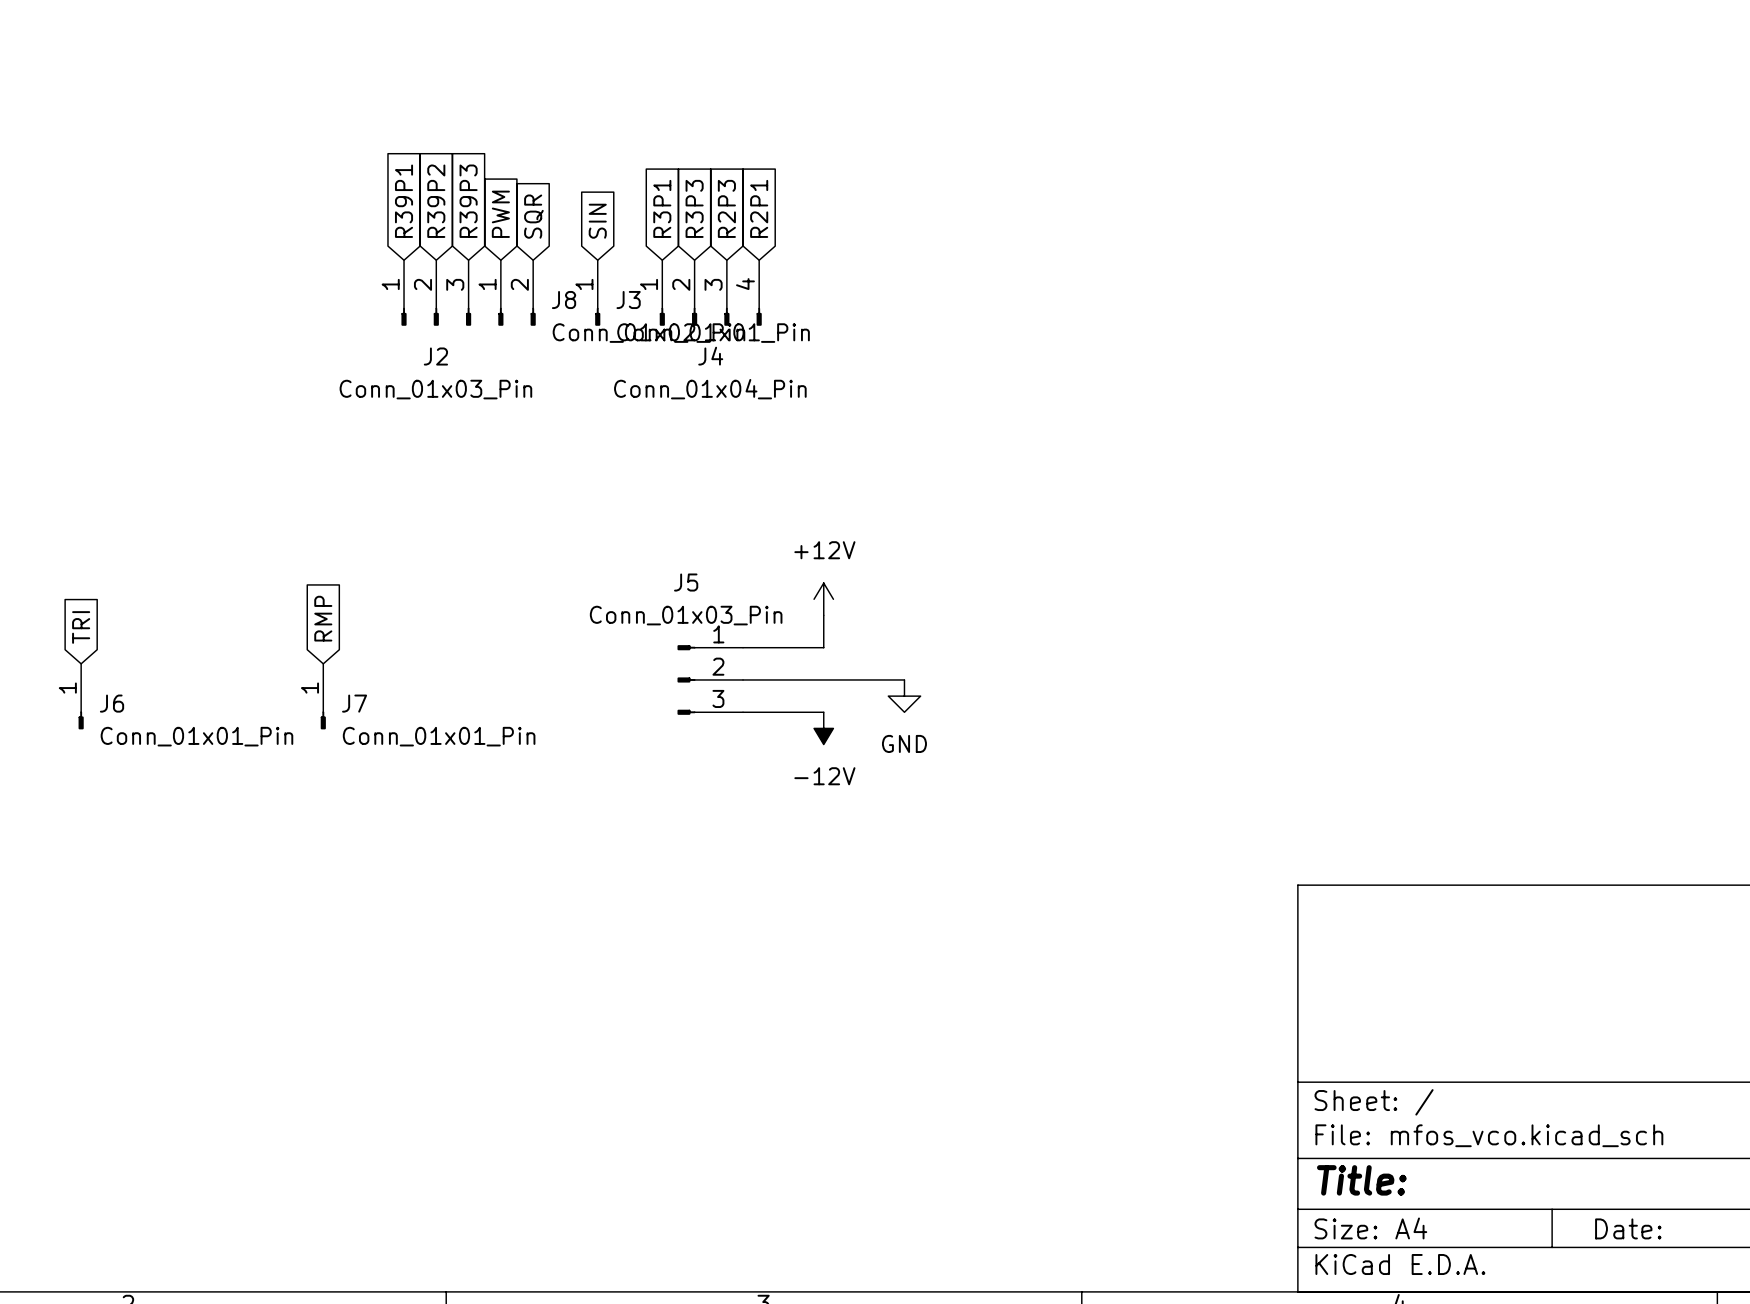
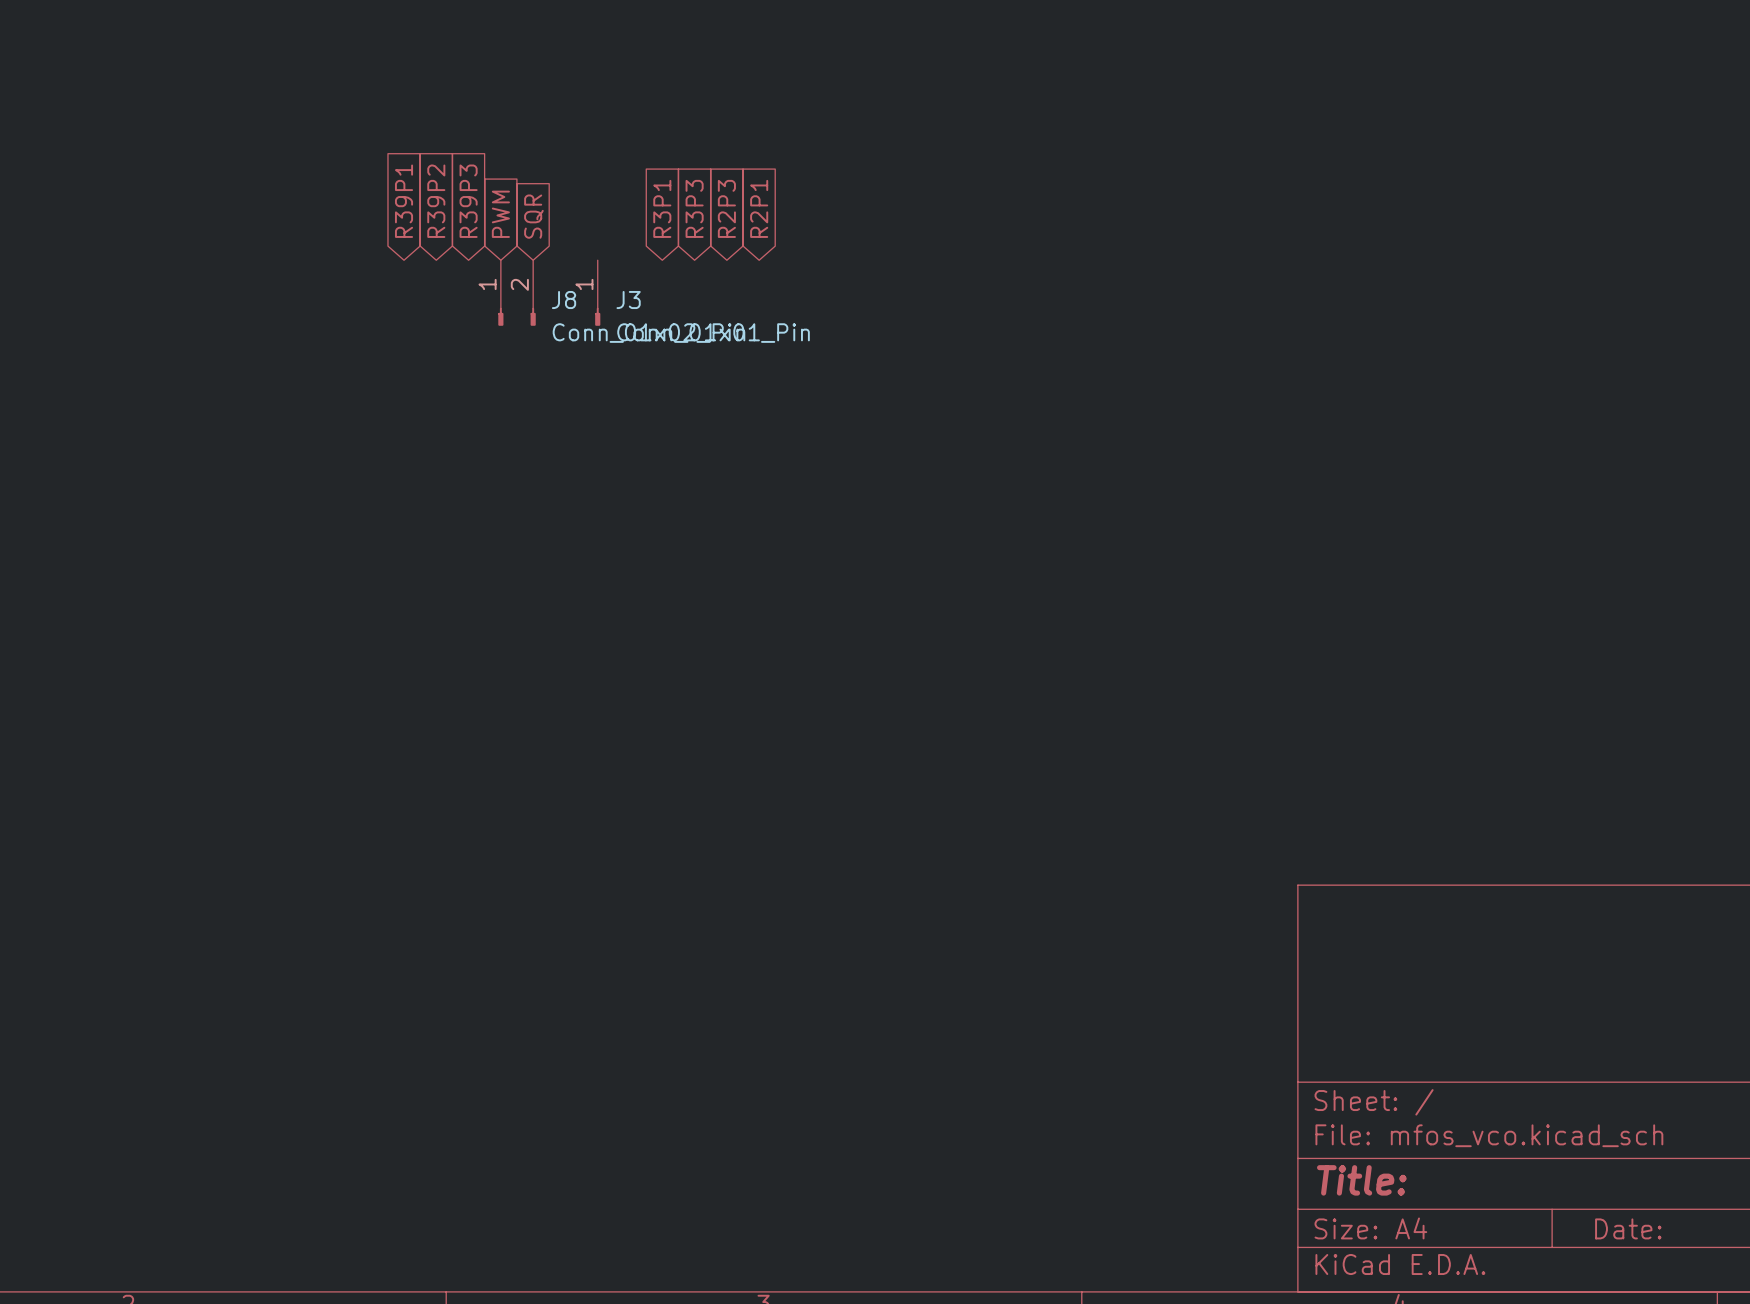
global label: SIN (597, 221) -> none
J2: Conn_01x03_Pin (436, 293) -> none
J4: Conn_01x04_Pin (710, 293) -> none
power symbol: +12V (823, 599) -> none
wire: (823, 615) (823, 647) (743, 647) -> none
global label: RMP (323, 618) -> none
global label: TRI (81, 627) -> none
J5: Conn_01x03_Pin (710, 679) -> none
wire: (743, 679) (904, 679) -> none
J6: Conn_01x01_Pin (81, 696) -> none
J7: Conn_01x01_Pin (323, 696) -> none
power symbol: GND (904, 696) -> none
wire: (743, 712) (823, 712) -> none
power symbol: -12V (823, 728) -> none

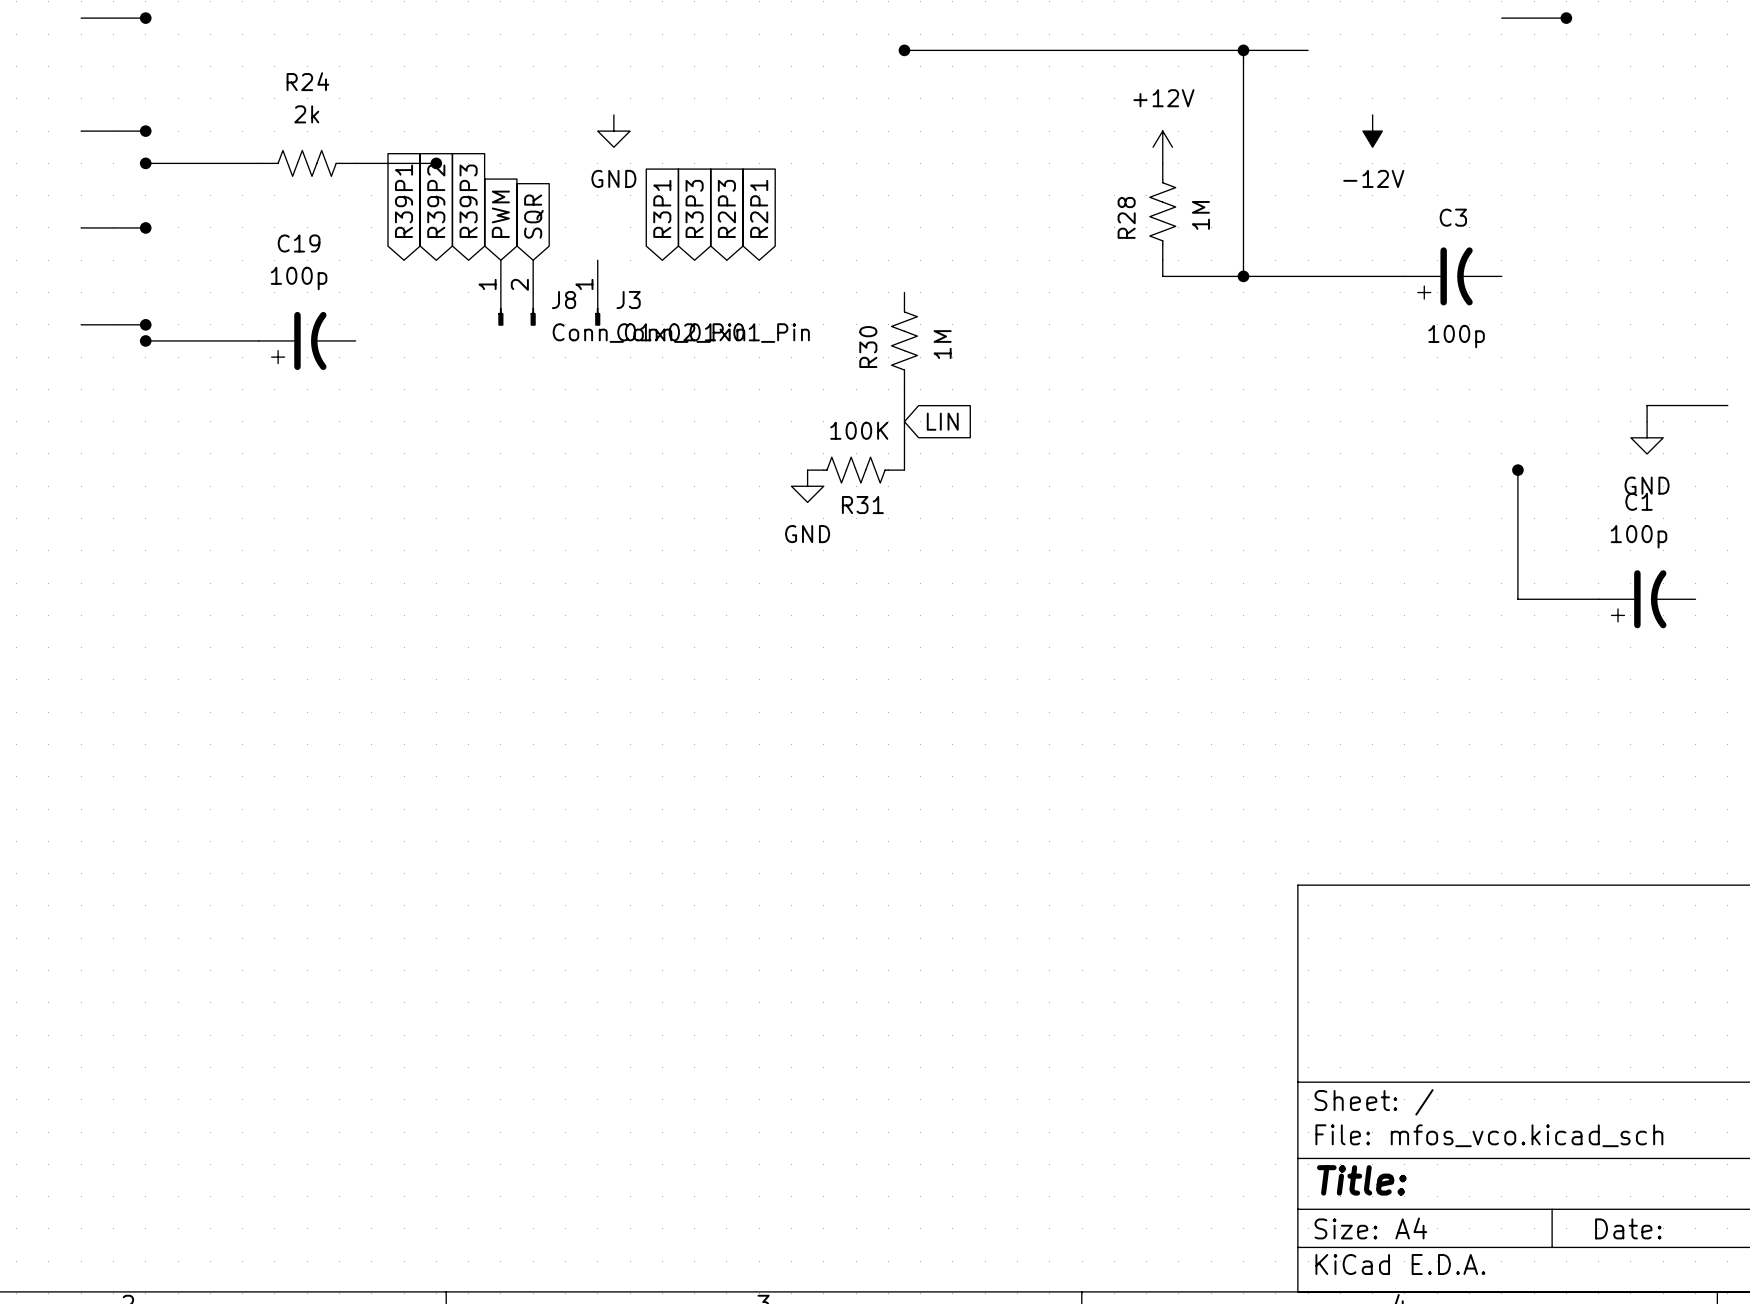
wire: none -> (81, 18) (145, 18)
junction: none -> (145, 18)
wire: none -> (1501, 18) (1566, 18)
junction: none -> (1566, 18)
wire: none -> (904, 50) (1308, 50)
junction: none -> (904, 50)
wire: none -> (1243, 50) (1243, 276)
junction: none -> (1243, 50)
wire: none -> (81, 131) (145, 131)
junction: none -> (145, 131)
power symbol: none -> GND (613, 131)
power symbol: none -> -12V (1372, 131)
power symbol: none -> +12V (1162, 147)
wire: none -> (145, 163) (258, 163)
junction: none -> (145, 163)
R24: none -> 2k (307, 163)
wire: none -> (355, 163) (436, 163)
junction: none -> (436, 163)
R28: none -> 1M (1162, 211)
wire: none -> (81, 227) (145, 227)
junction: none -> (145, 227)
wire: none -> (1162, 260) (1162, 276) (1404, 276)
junction: none -> (1243, 276)
C3: none -> 100p (1453, 276)
wire: none -> (81, 324) (145, 324)
junction: none -> (145, 324)
wire: none -> (145, 340) (258, 340)
junction: none -> (145, 340)
C19: none -> 100p (307, 340)
R30: none -> 1M (904, 340)
wire: none -> (904, 389) (904, 470)
wire: none -> (1727, 405) (1647, 405) (1647, 421)
global label: none -> LIN (942, 421)
power symbol: none -> GND (1647, 437)
R31: none -> 100K (856, 470)
wire: none -> (1517, 470) (1517, 599) (1598, 599)
junction: none -> (1517, 470)
power symbol: none -> GND (807, 486)
C1: none -> 100p (1647, 599)

